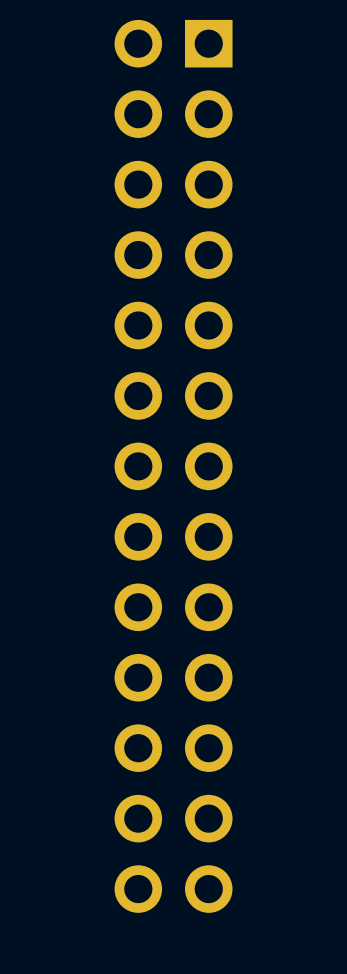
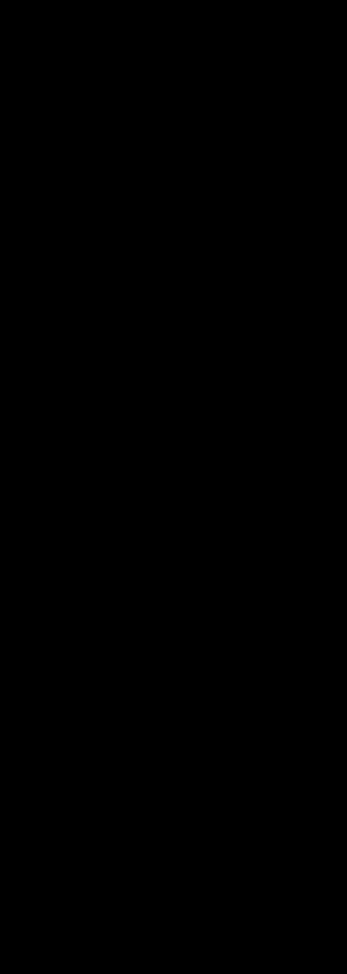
part: (173, 466) -> none

